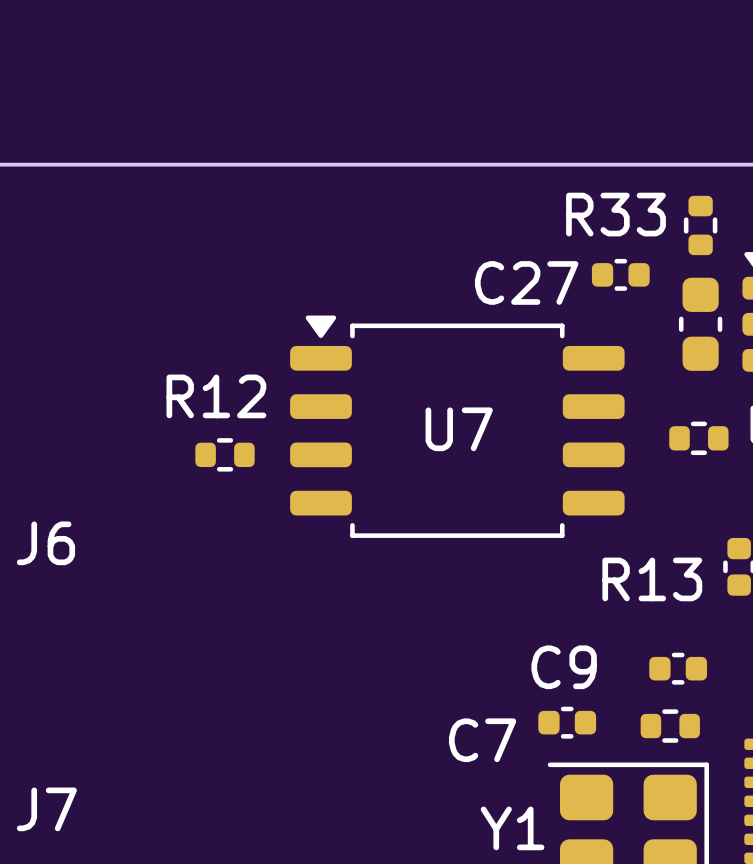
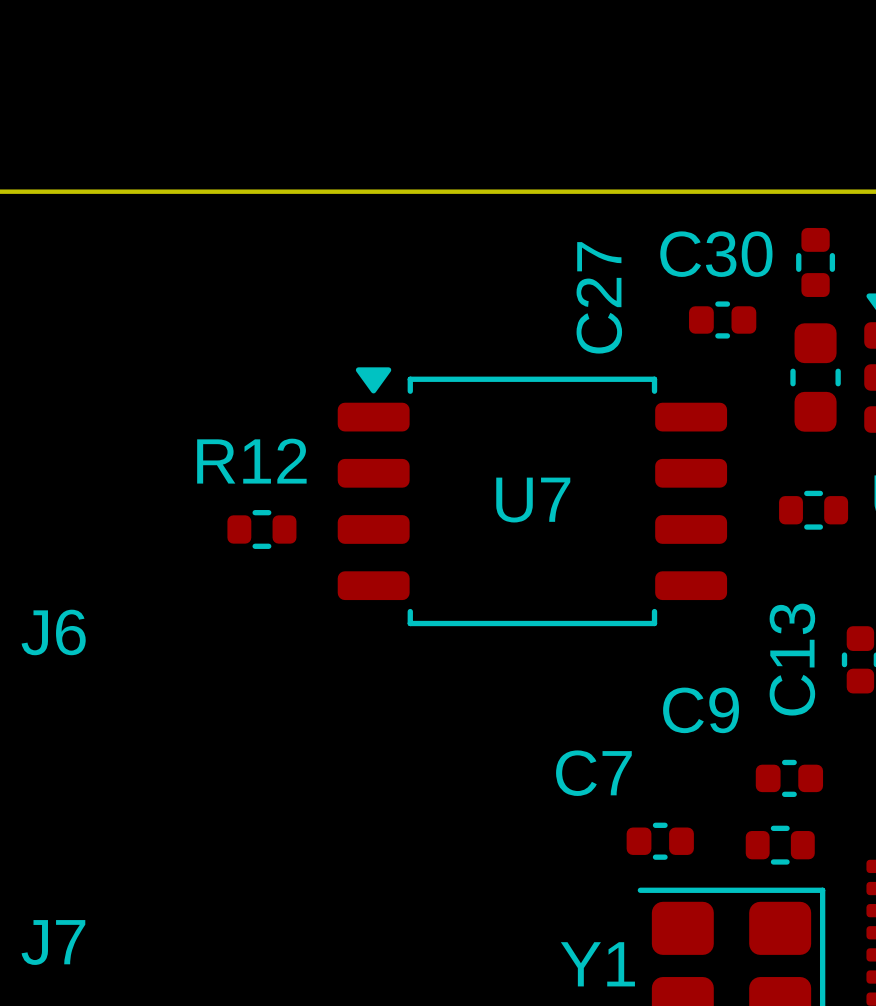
R33 name: R33 (616, 214) -> none
C30 name: none -> C30 (716, 254)
C27 name rotation: 0° (526, 282) -> 90° counterclockwise (599, 297)
C13 name: none -> C13 (792, 659)
R13 name: R13 (652, 579) -> none
C9 name position: C9 (564, 667) -> C9 (701, 710)
C7 name position: C7 (482, 740) -> C7 (593, 773)

